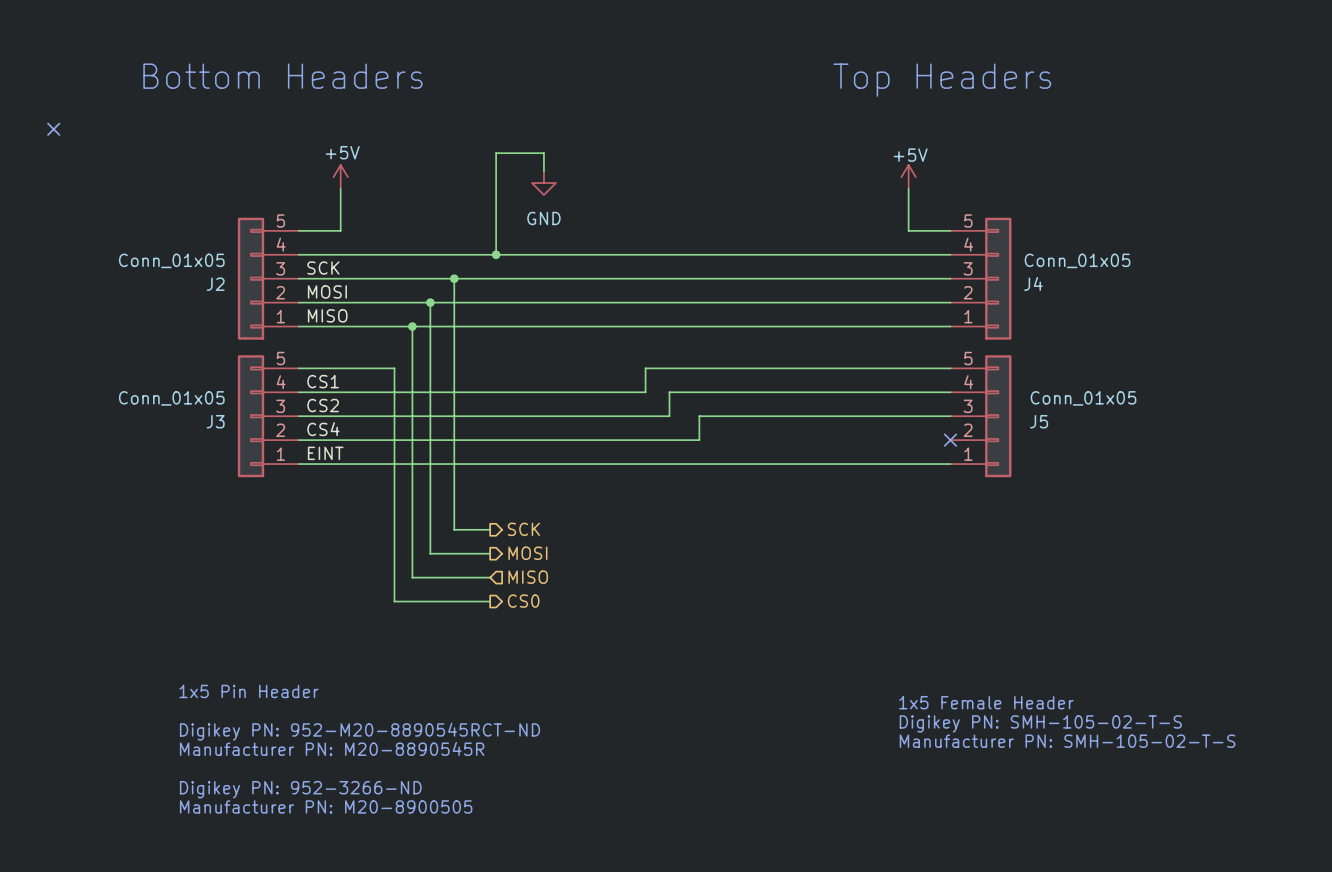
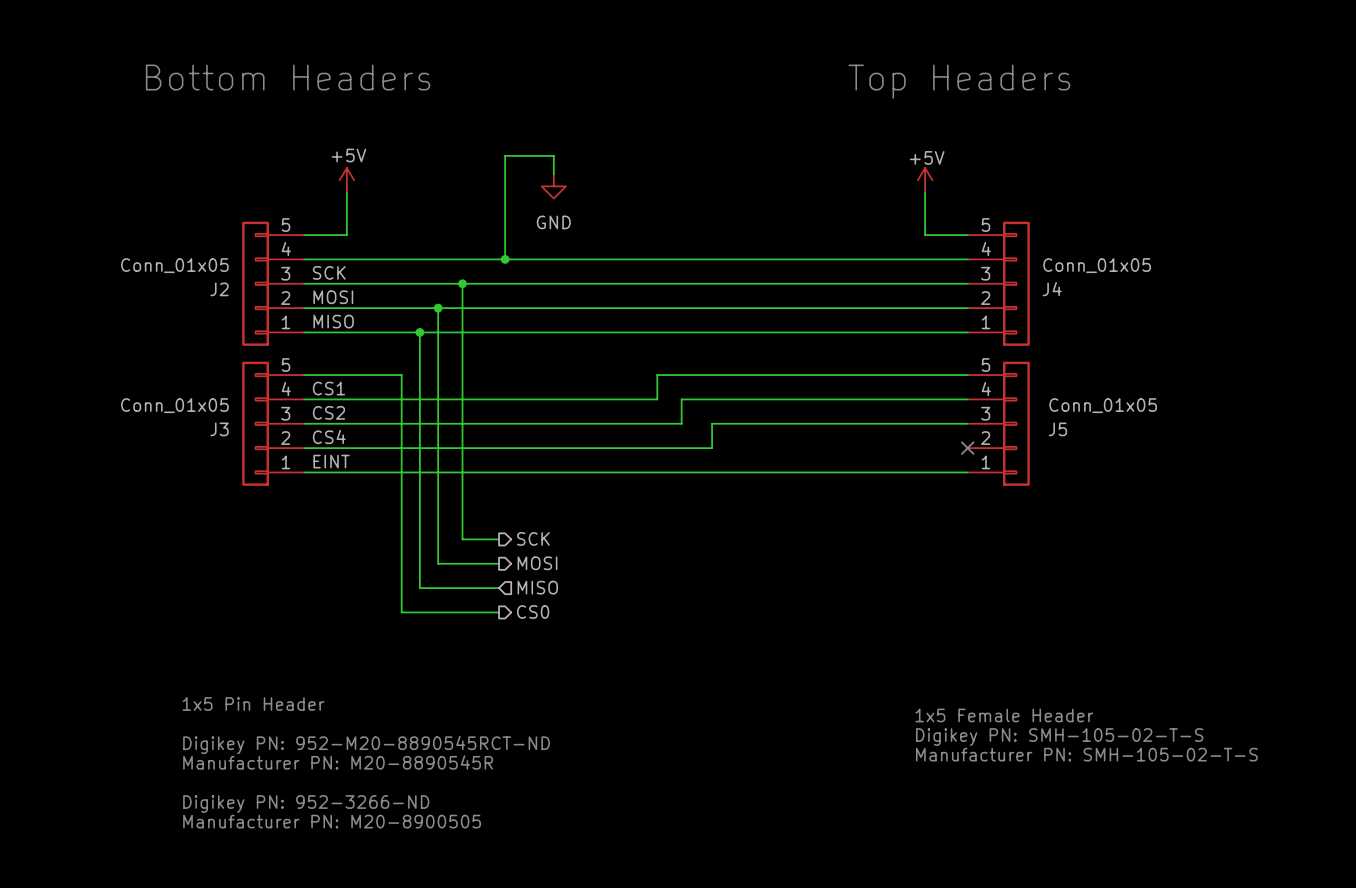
no-connect mark: (53, 129) -> none

